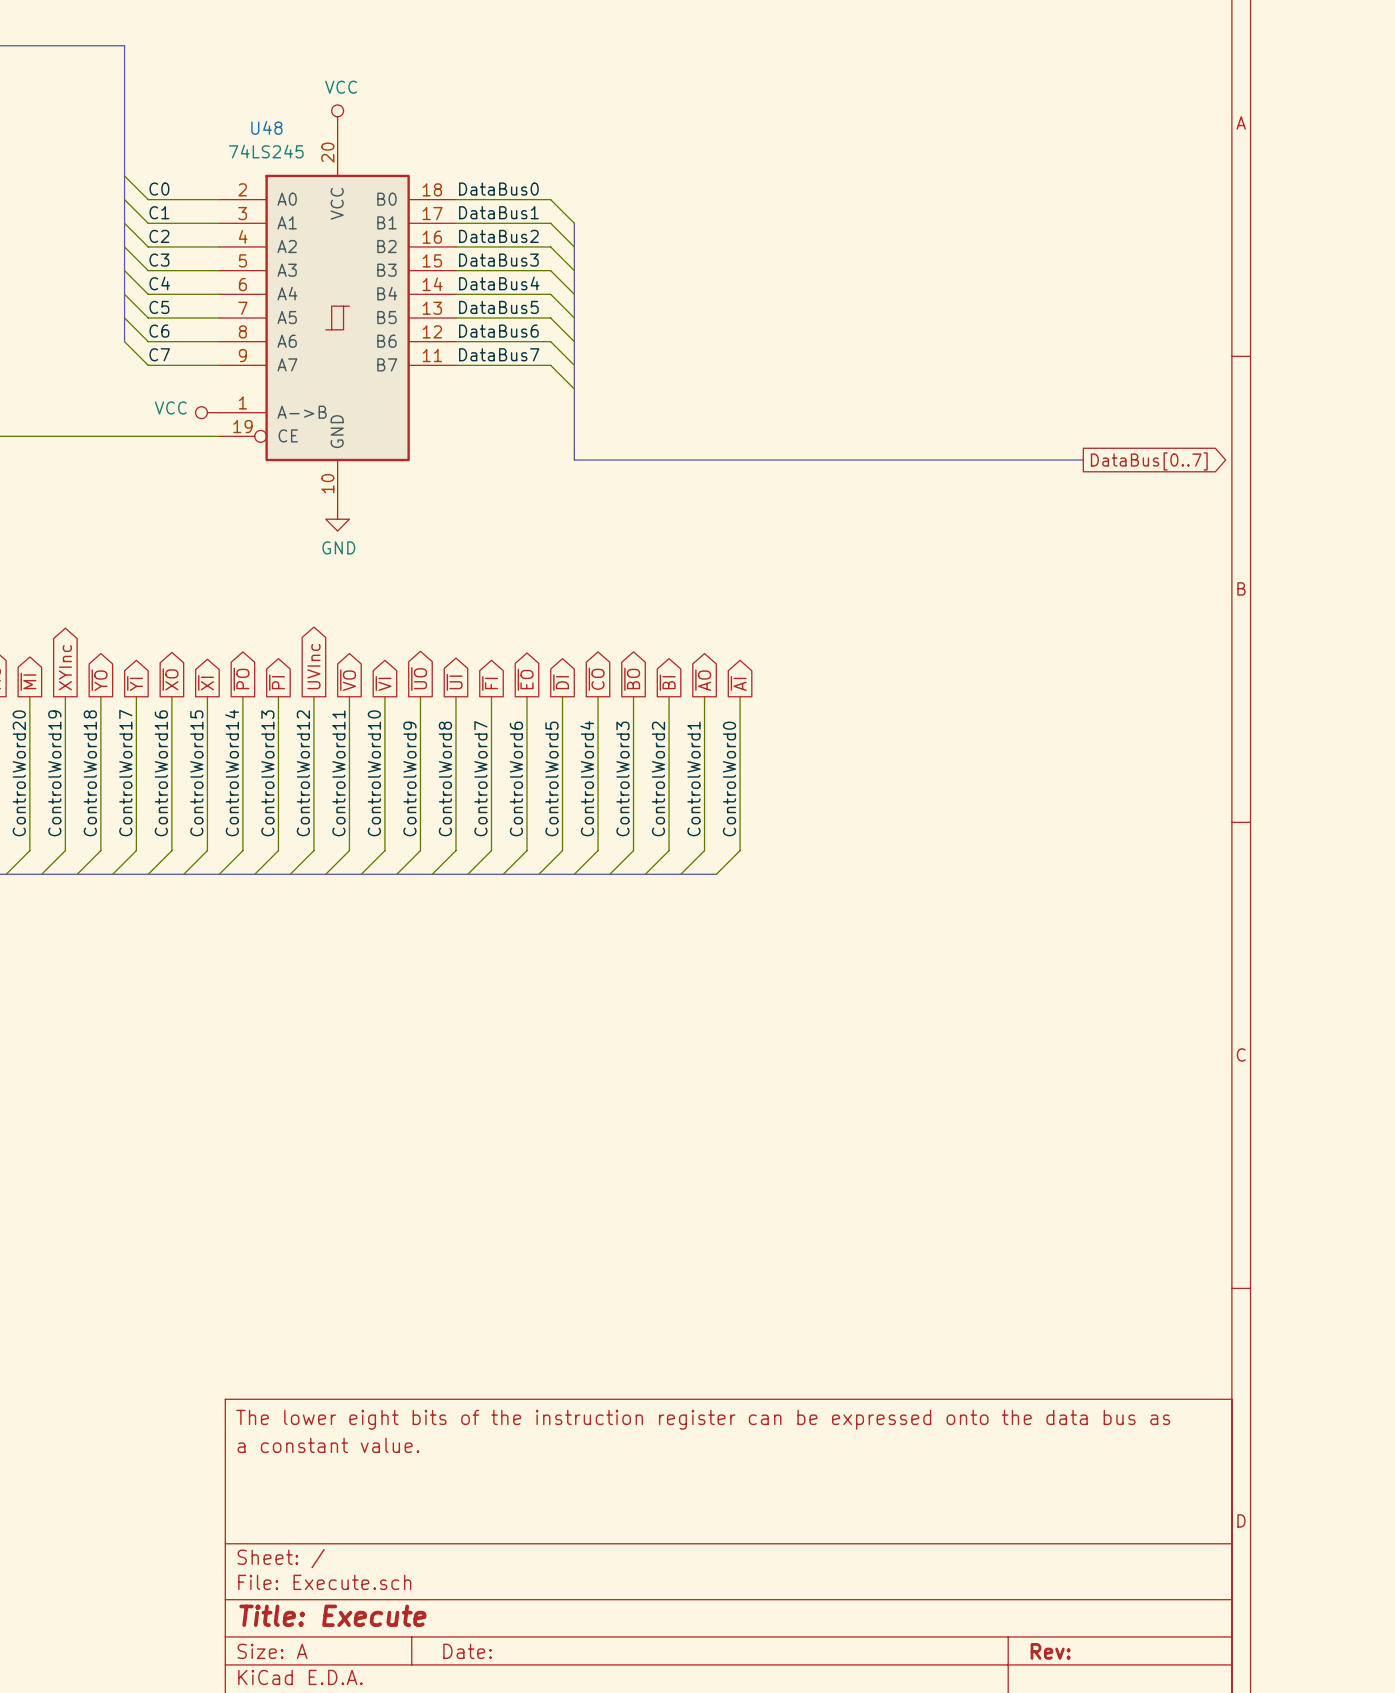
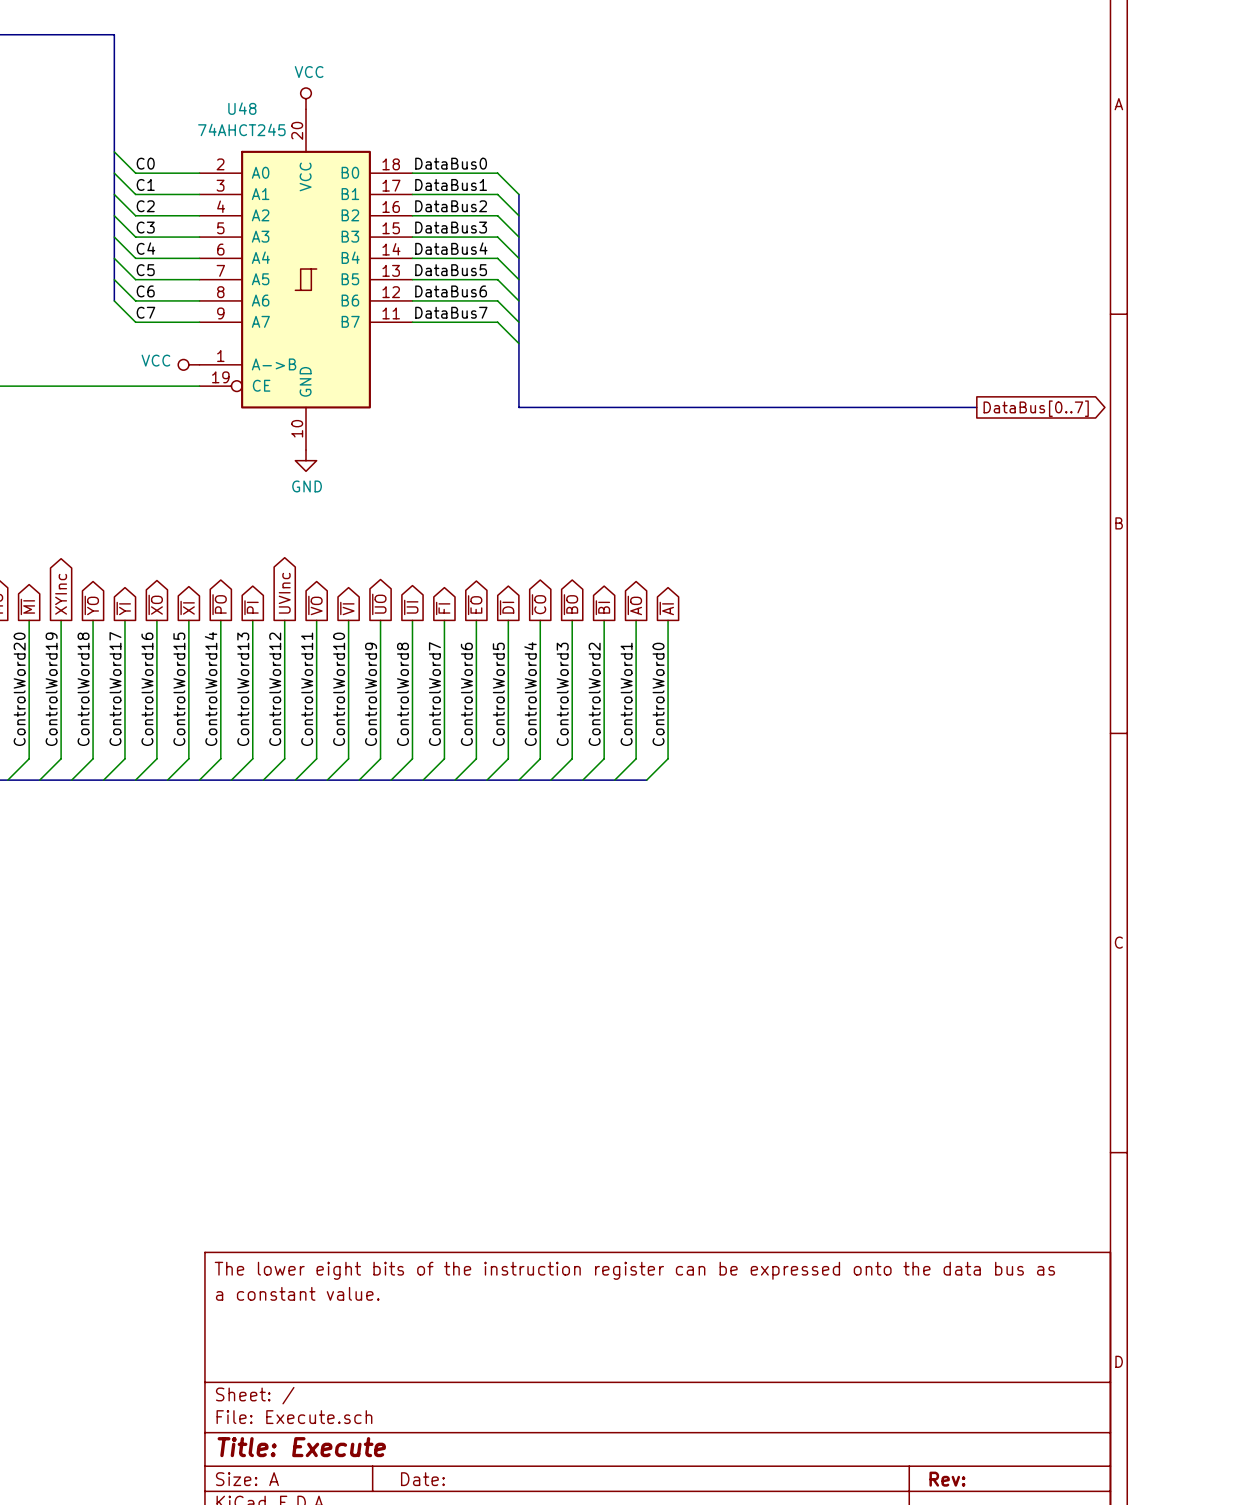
U48 value: 74LS245 (266, 151) -> 74AHCT245 (241, 129)

